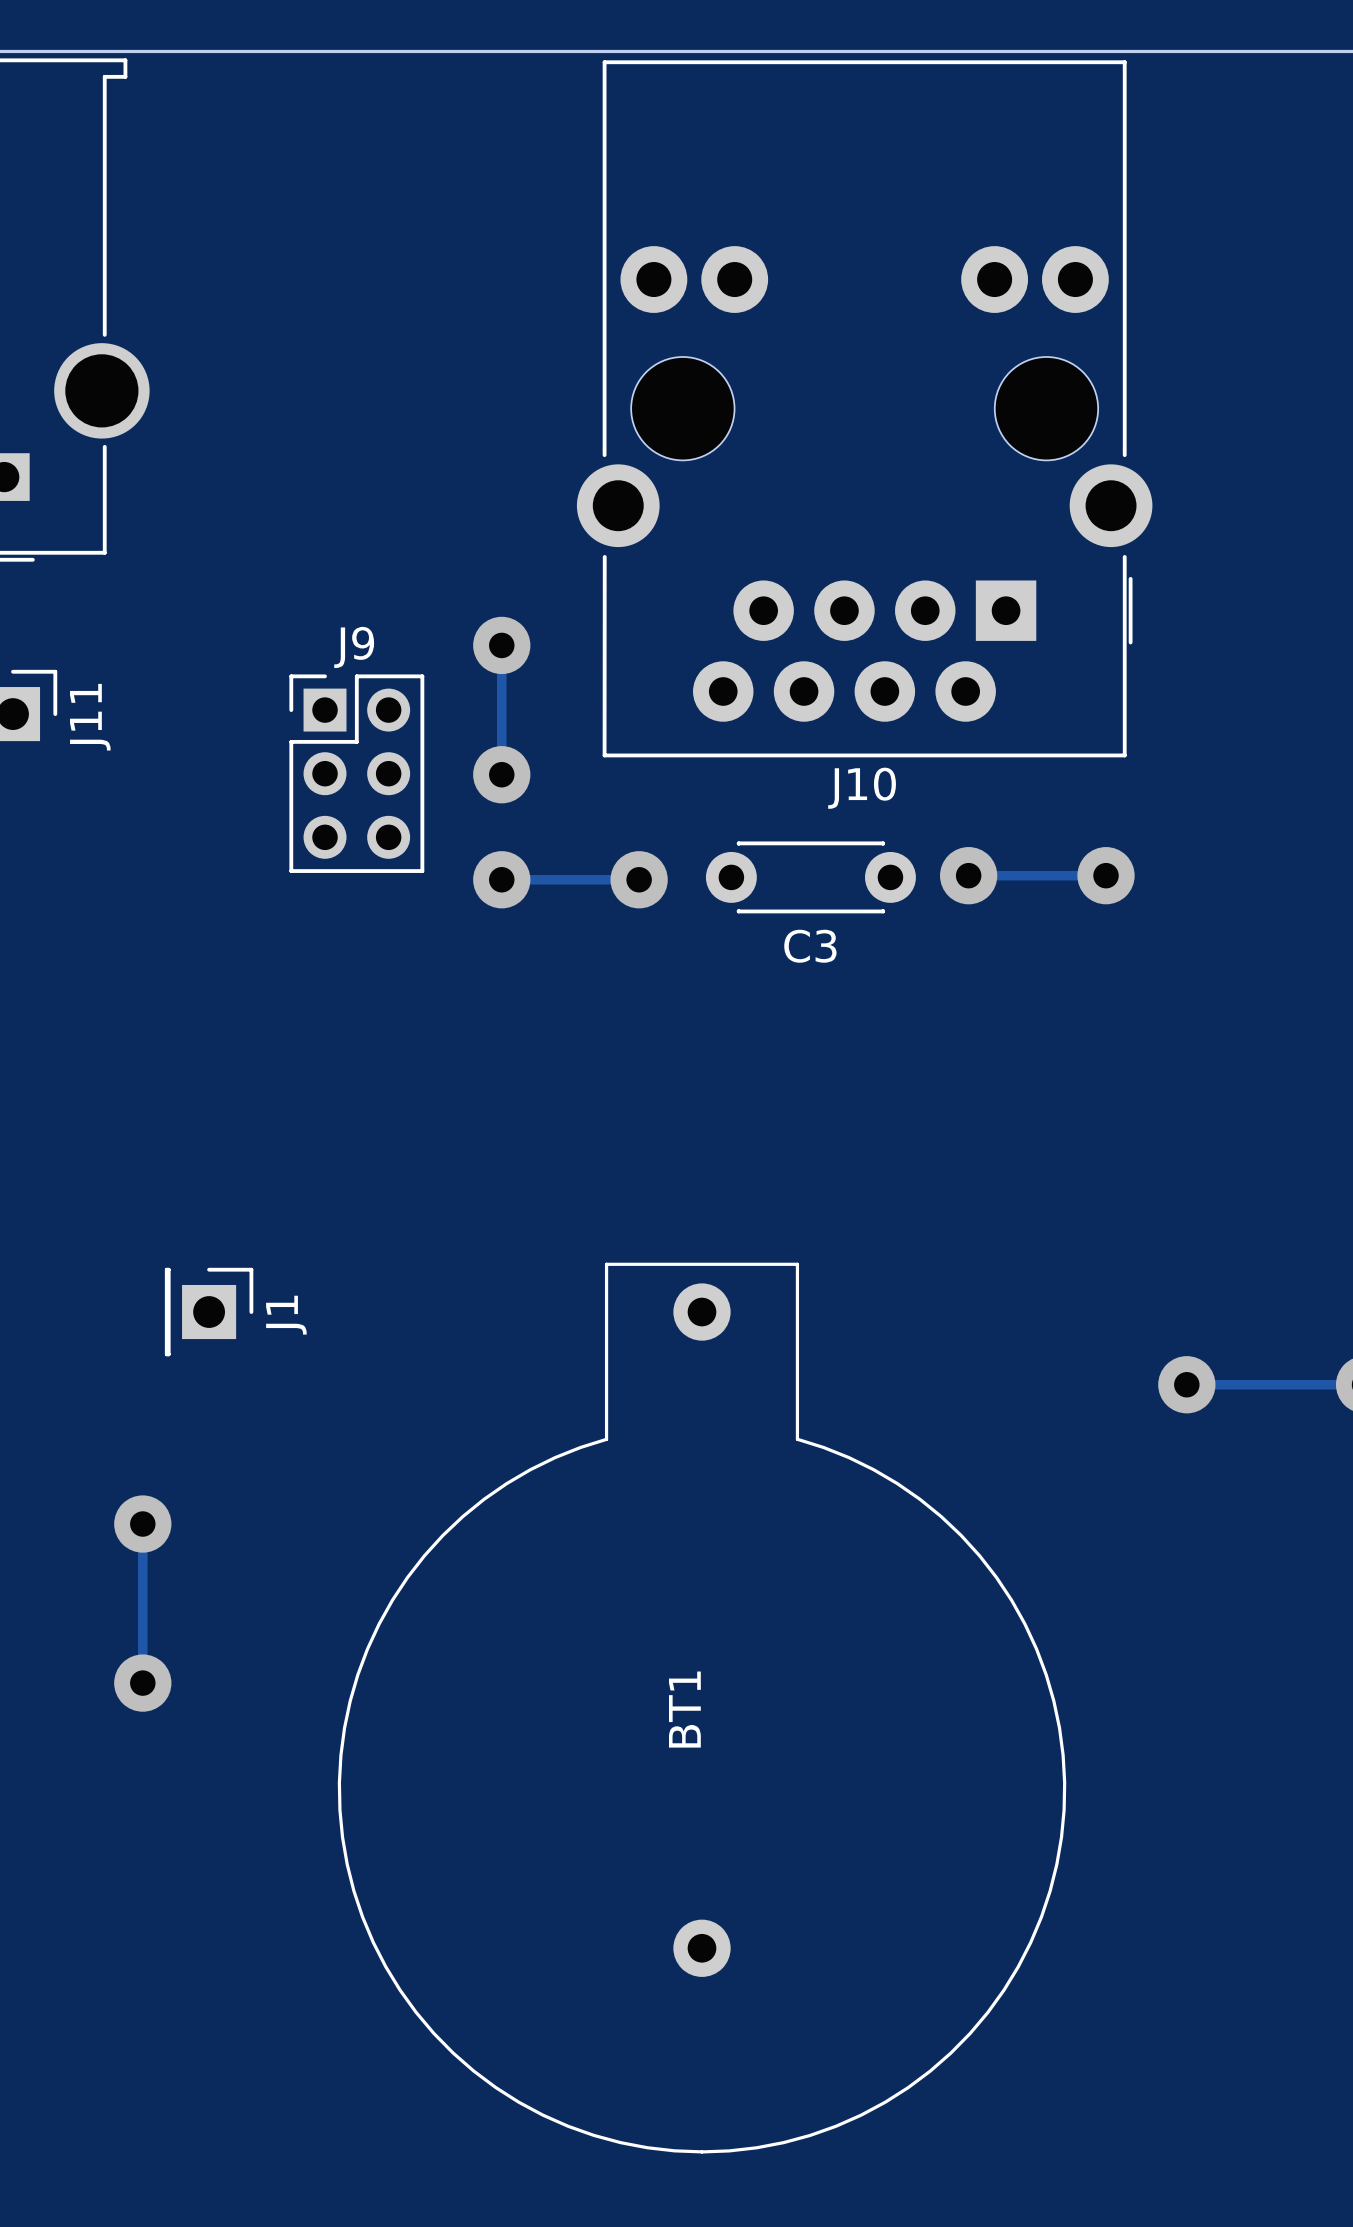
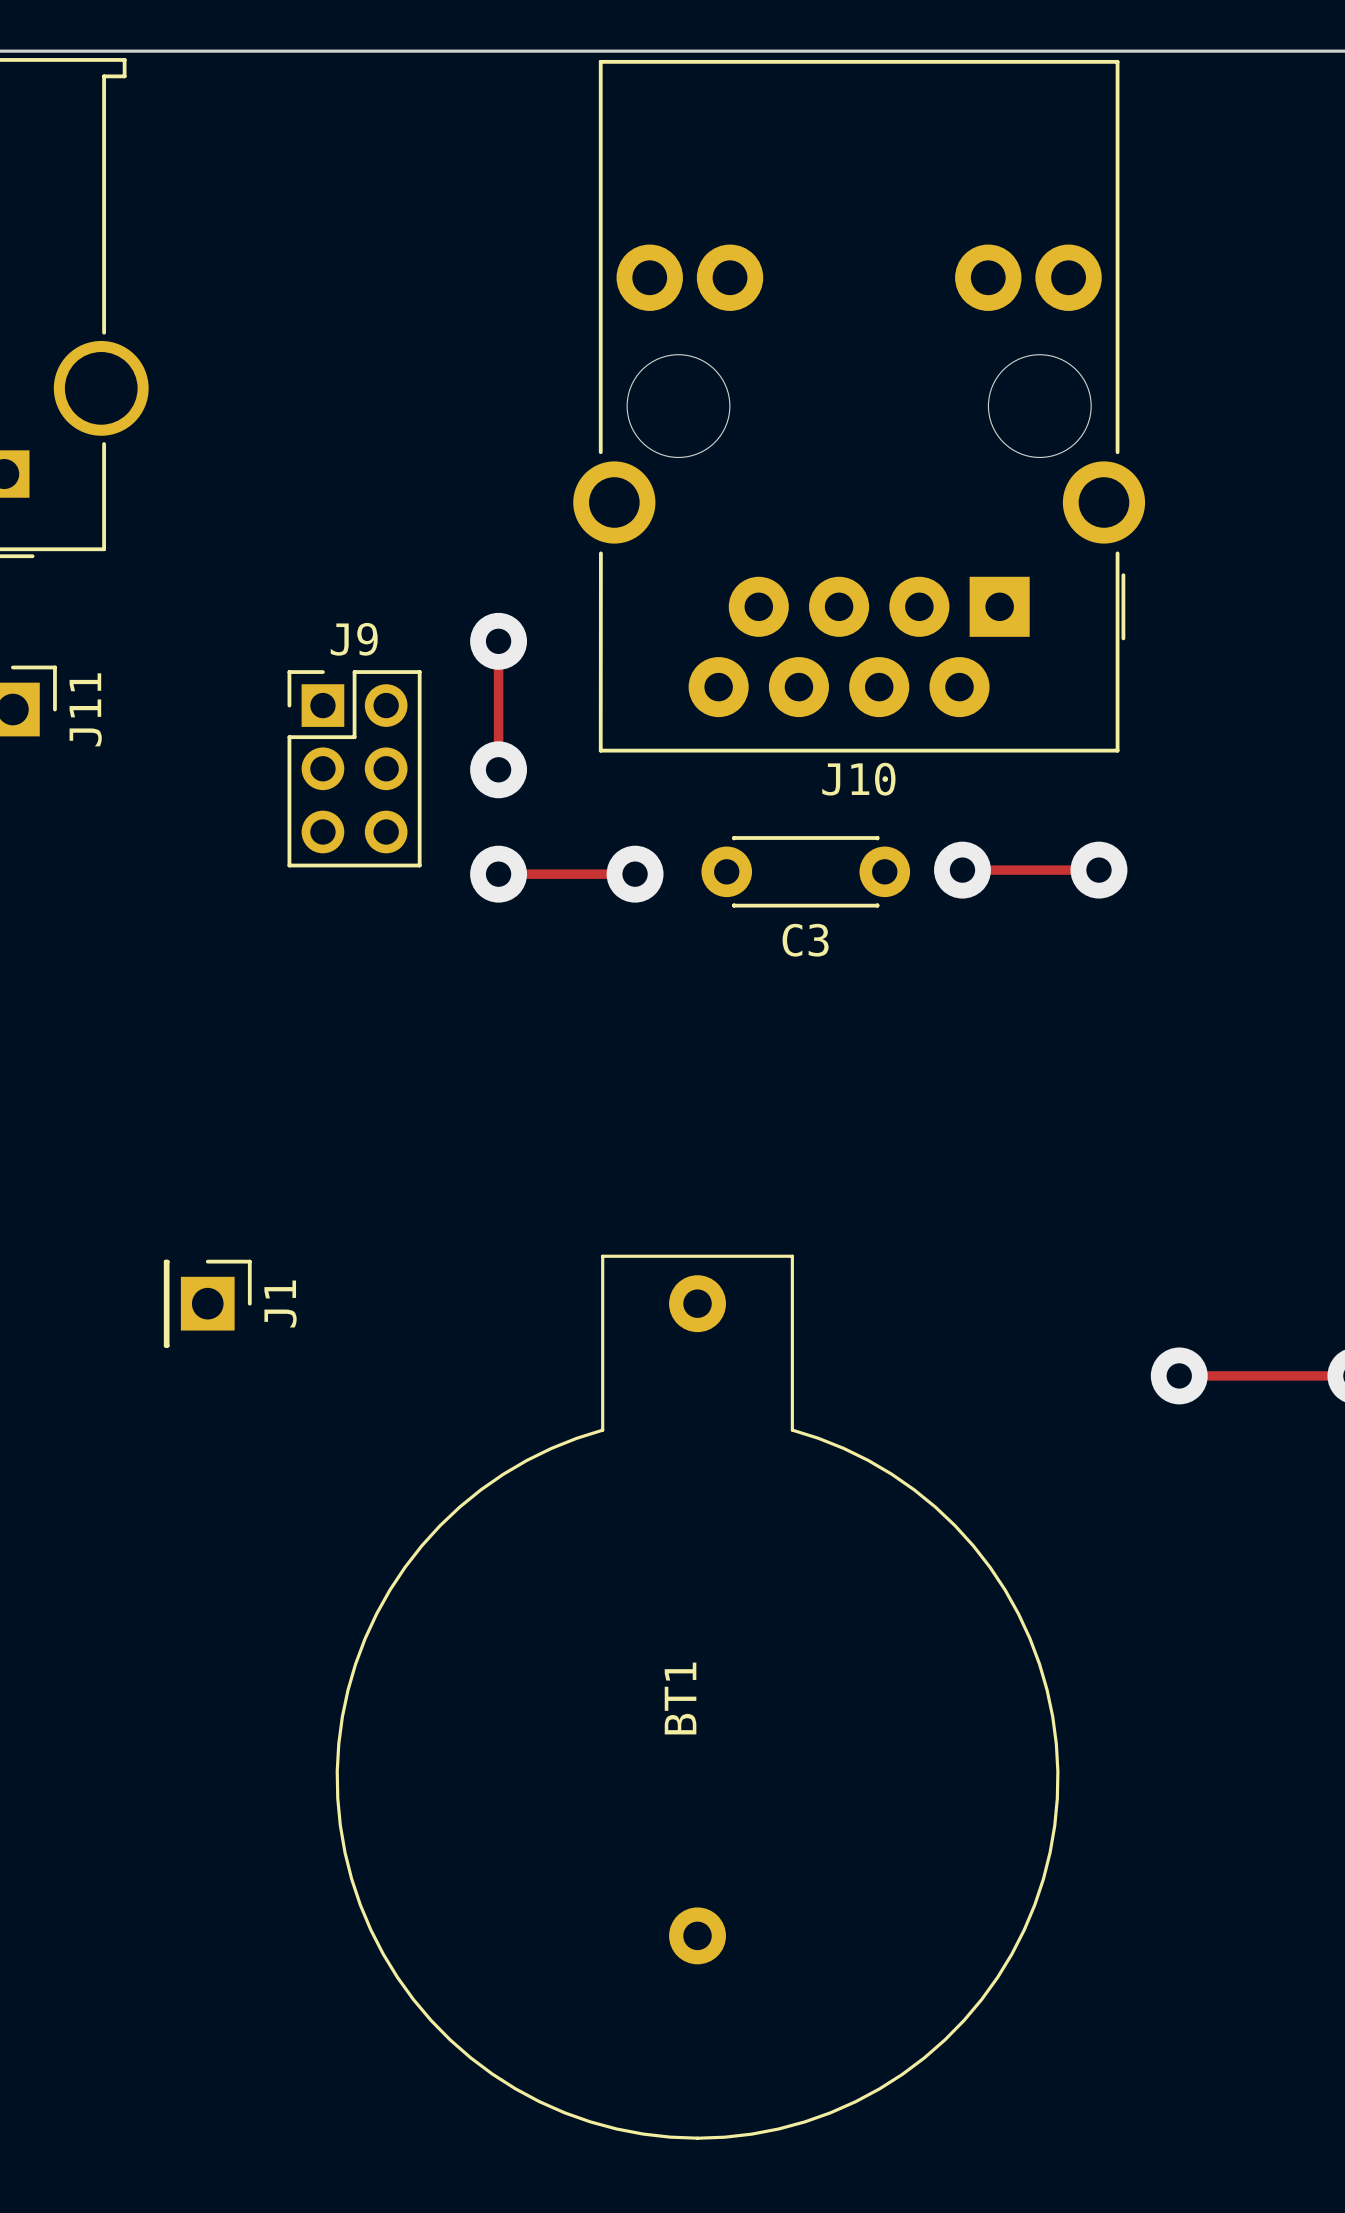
track: (142, 1524) (142, 1683) -> none
via: (142, 1524) -> none
via: (142, 1683) -> none

